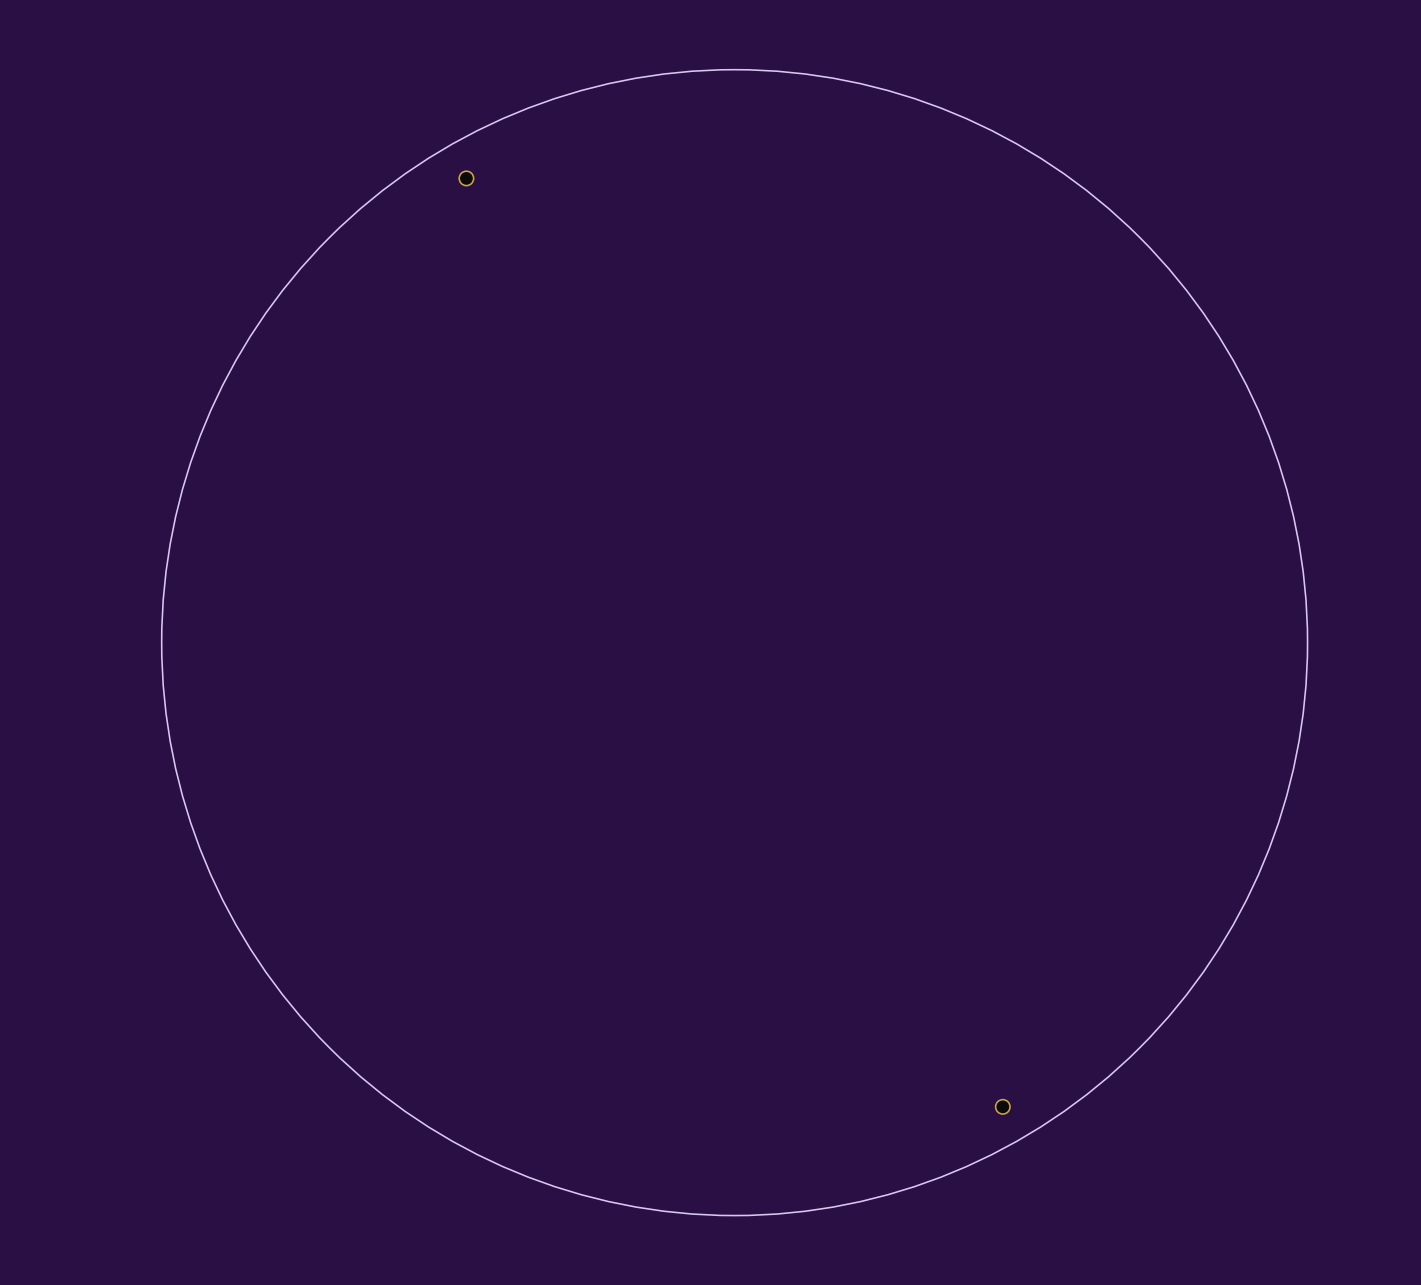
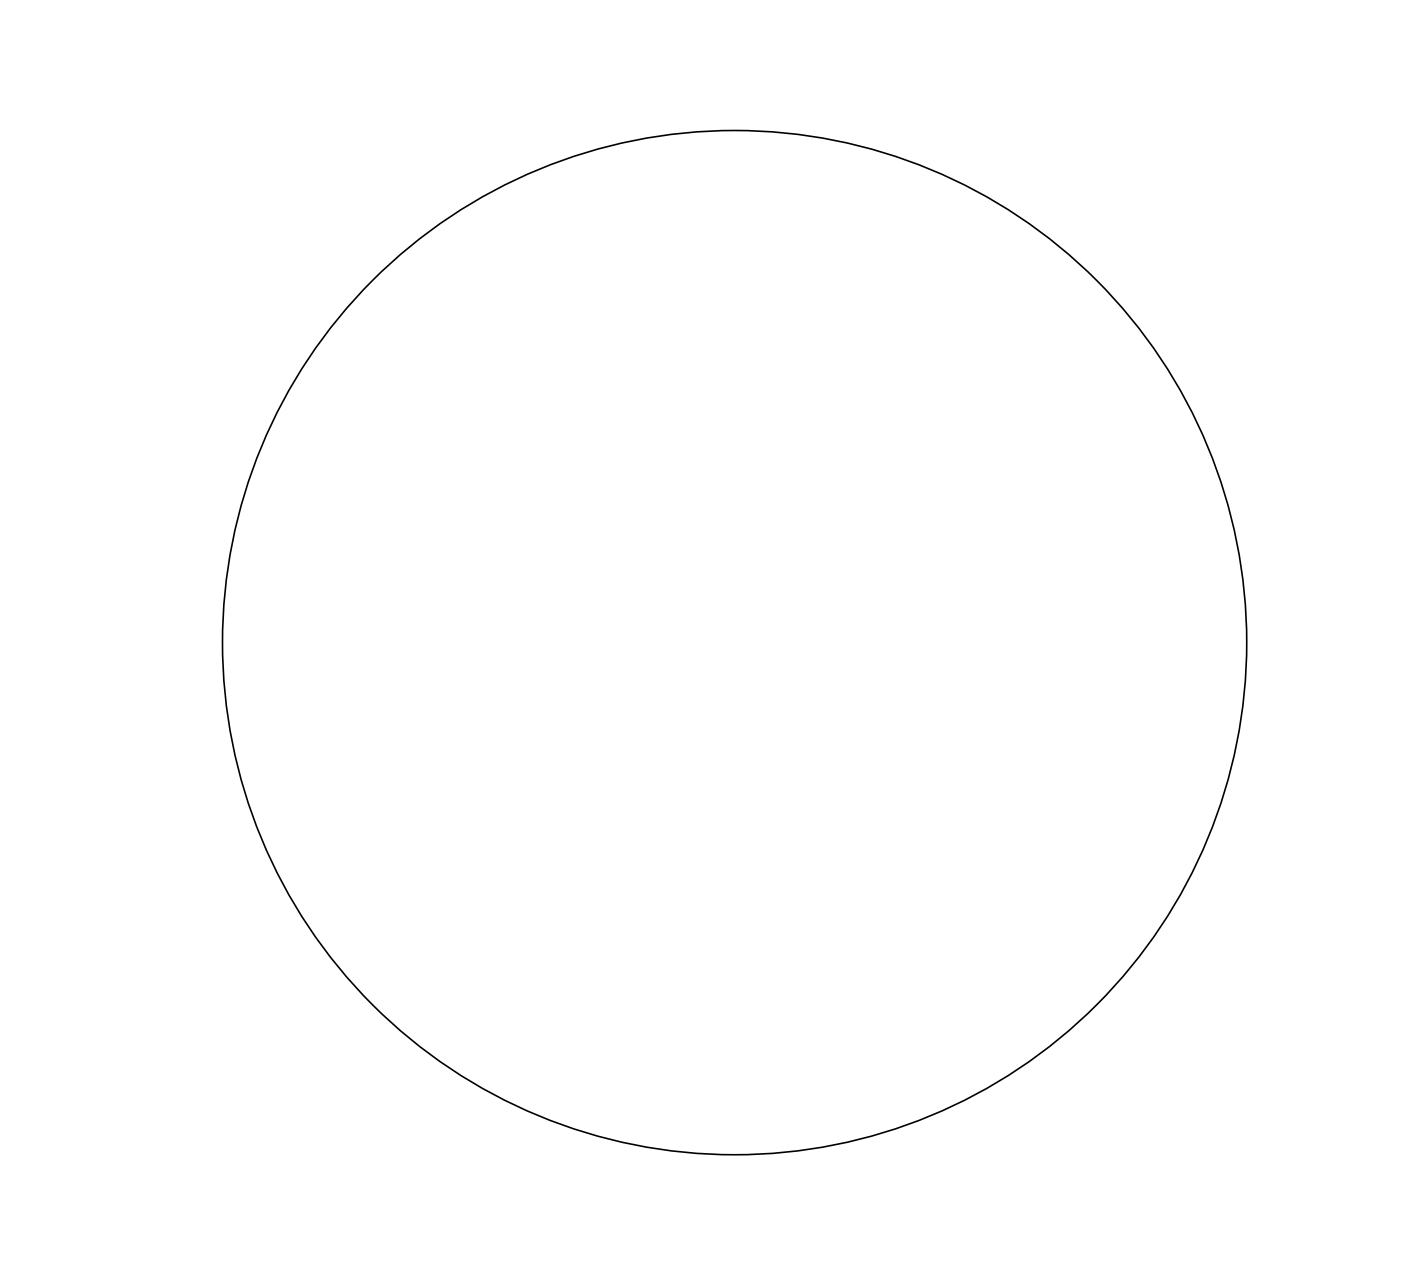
round board edge size: [160, 68, 1309, 1217] -> [221, 129, 1248, 1156]
via: (466, 178) -> none
via: (1002, 1106) -> none

